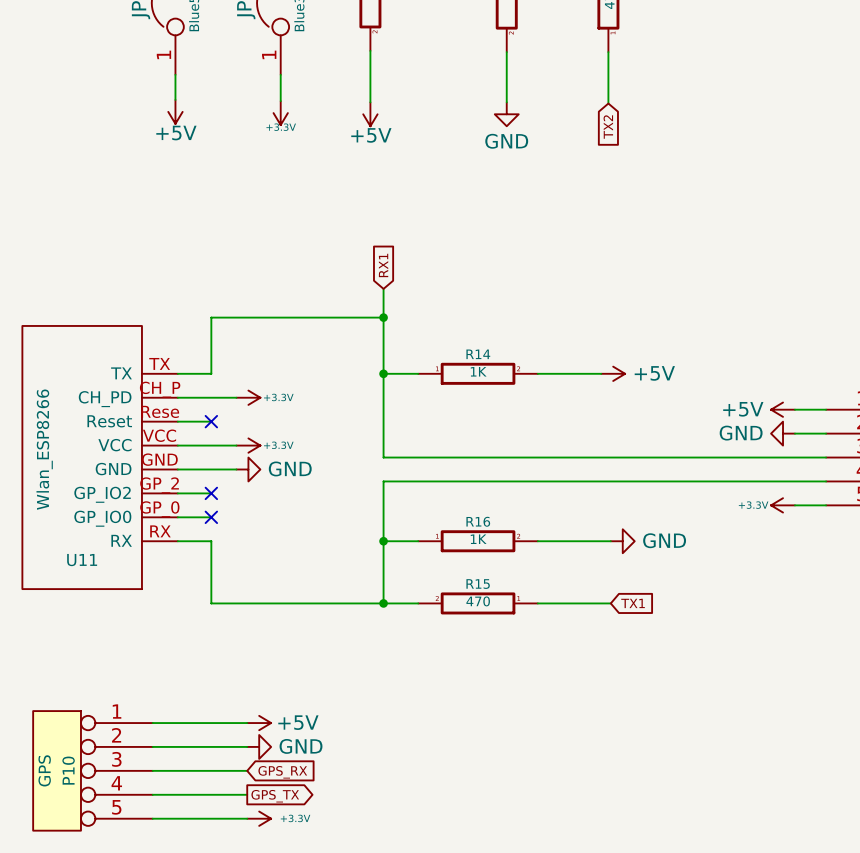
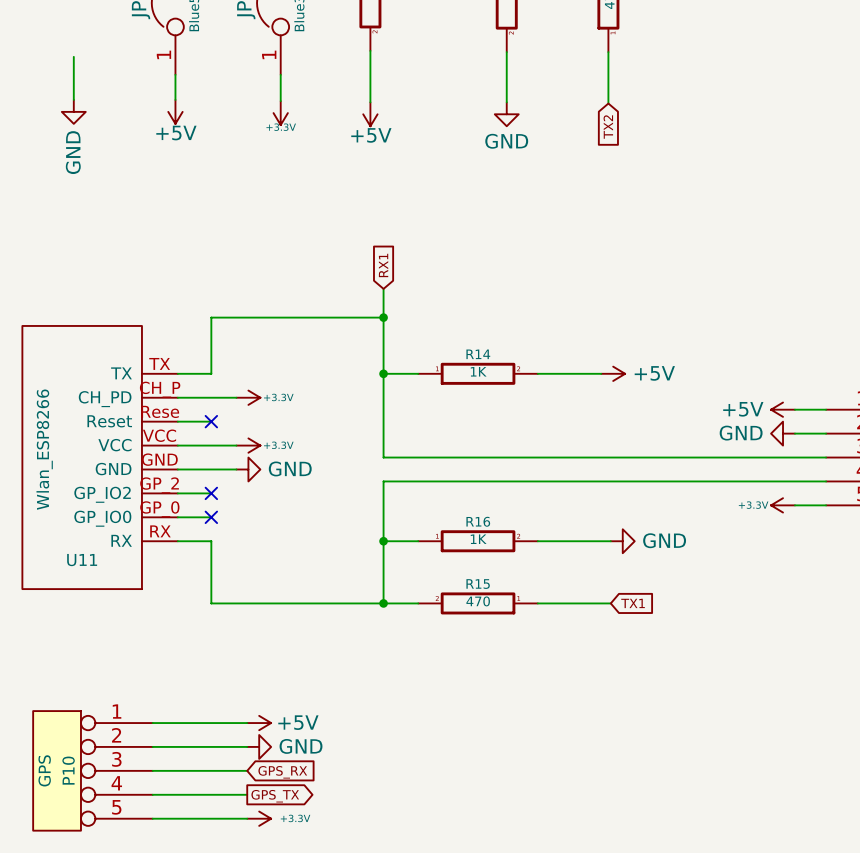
wire: none -> (73, 56) (73, 99)
power symbol: none -> GND (73, 111)

